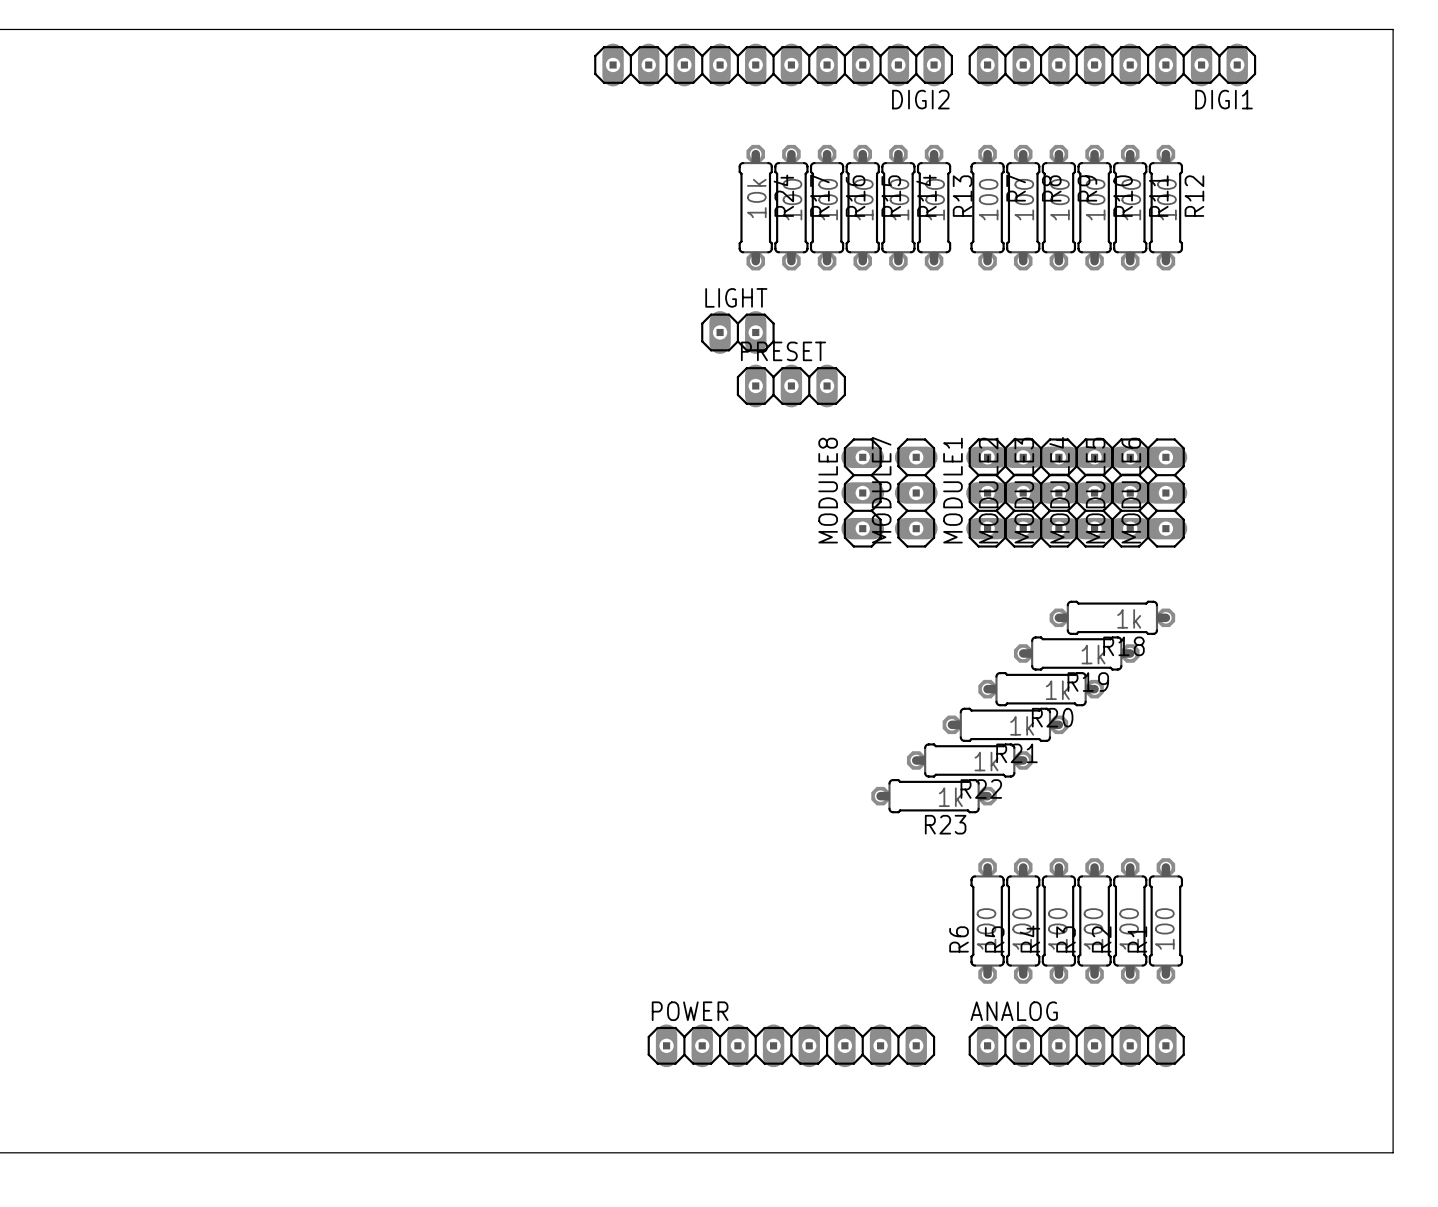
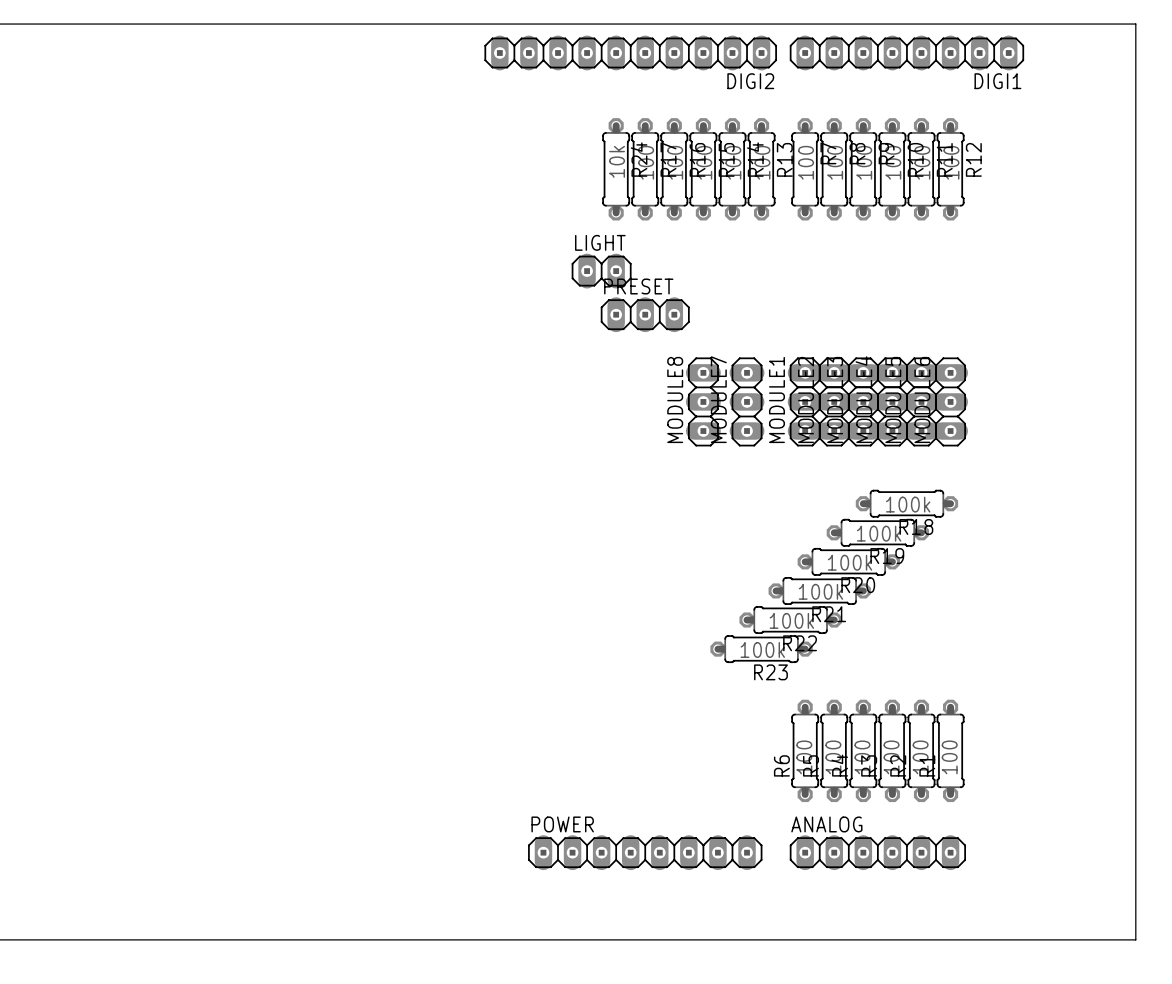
R18 value: 1k (1129, 618) -> 100k (908, 504)
R19 value: 1k (1093, 654) -> 100k (879, 533)
R20 value: 1k (1057, 690) -> 100k (850, 562)
R21 value: 1k (1022, 725) -> 100k (820, 591)
R22 value: 1k (986, 761) -> 100k (791, 620)
R23 value: 1k (950, 797) -> 100k (762, 649)

